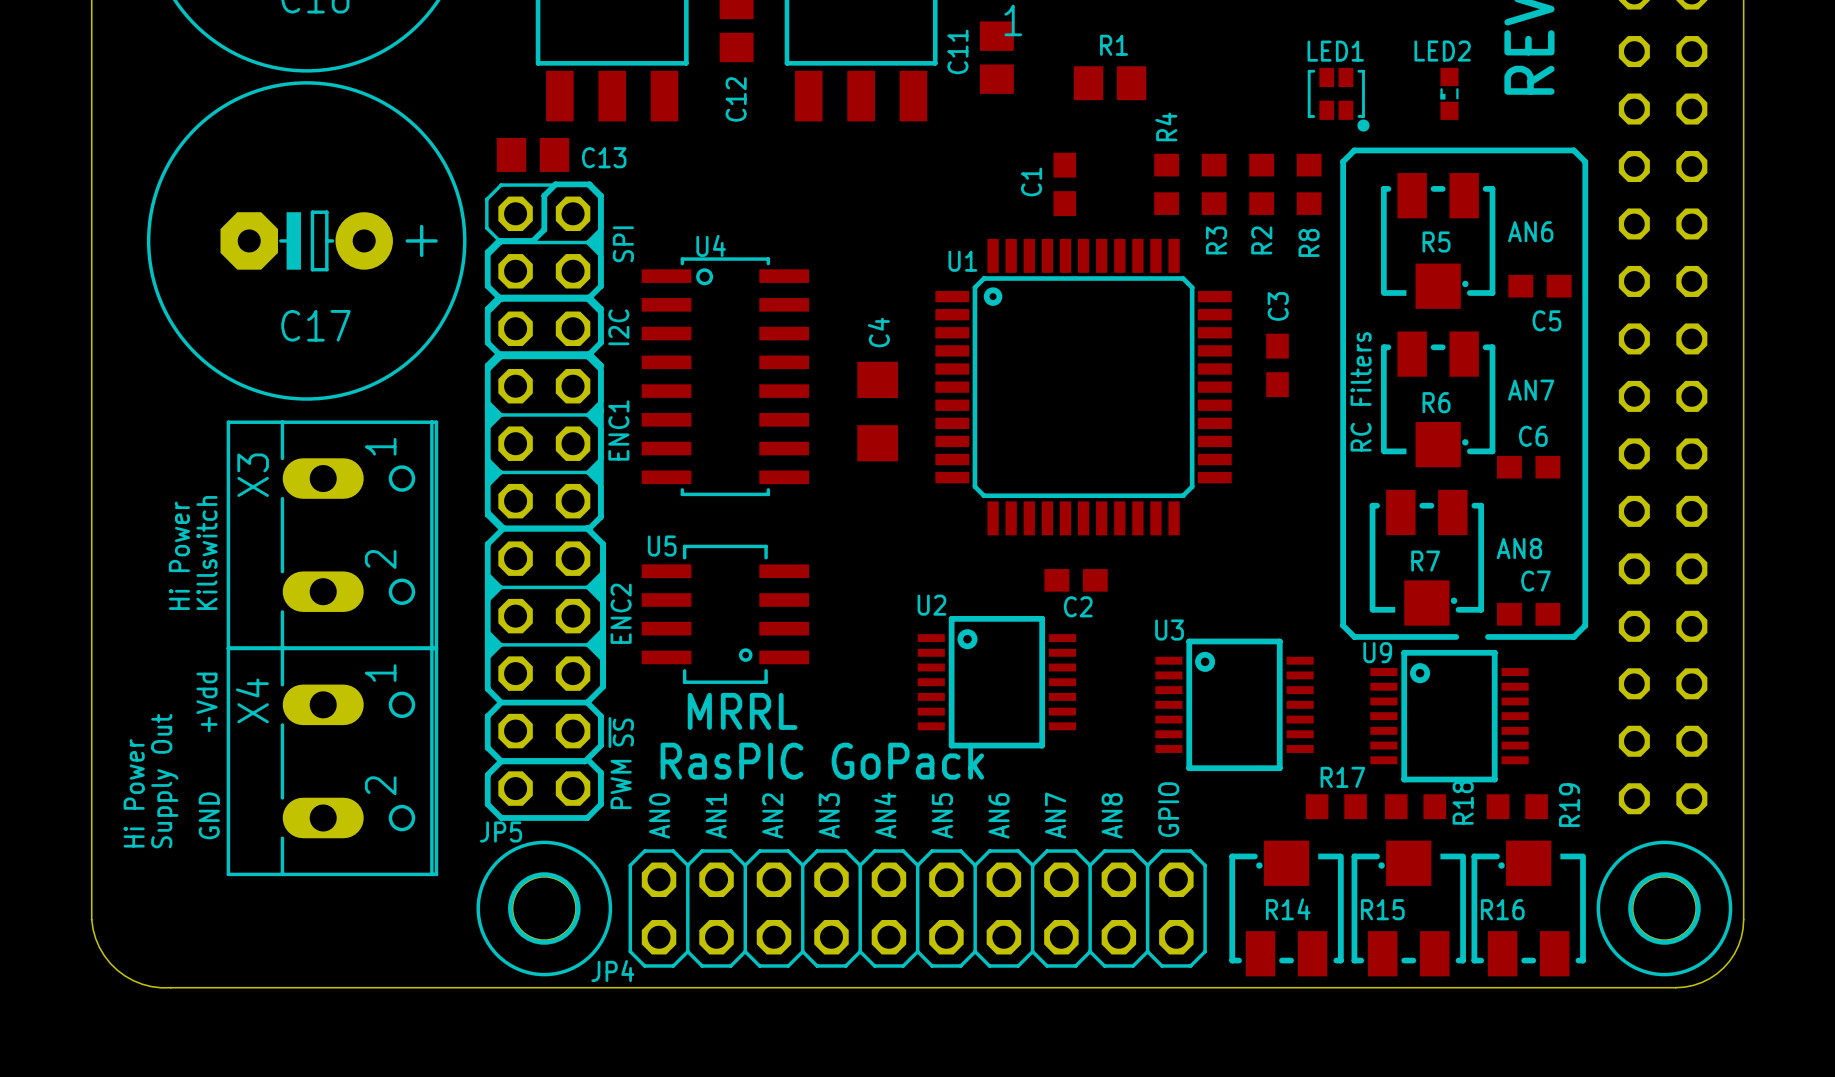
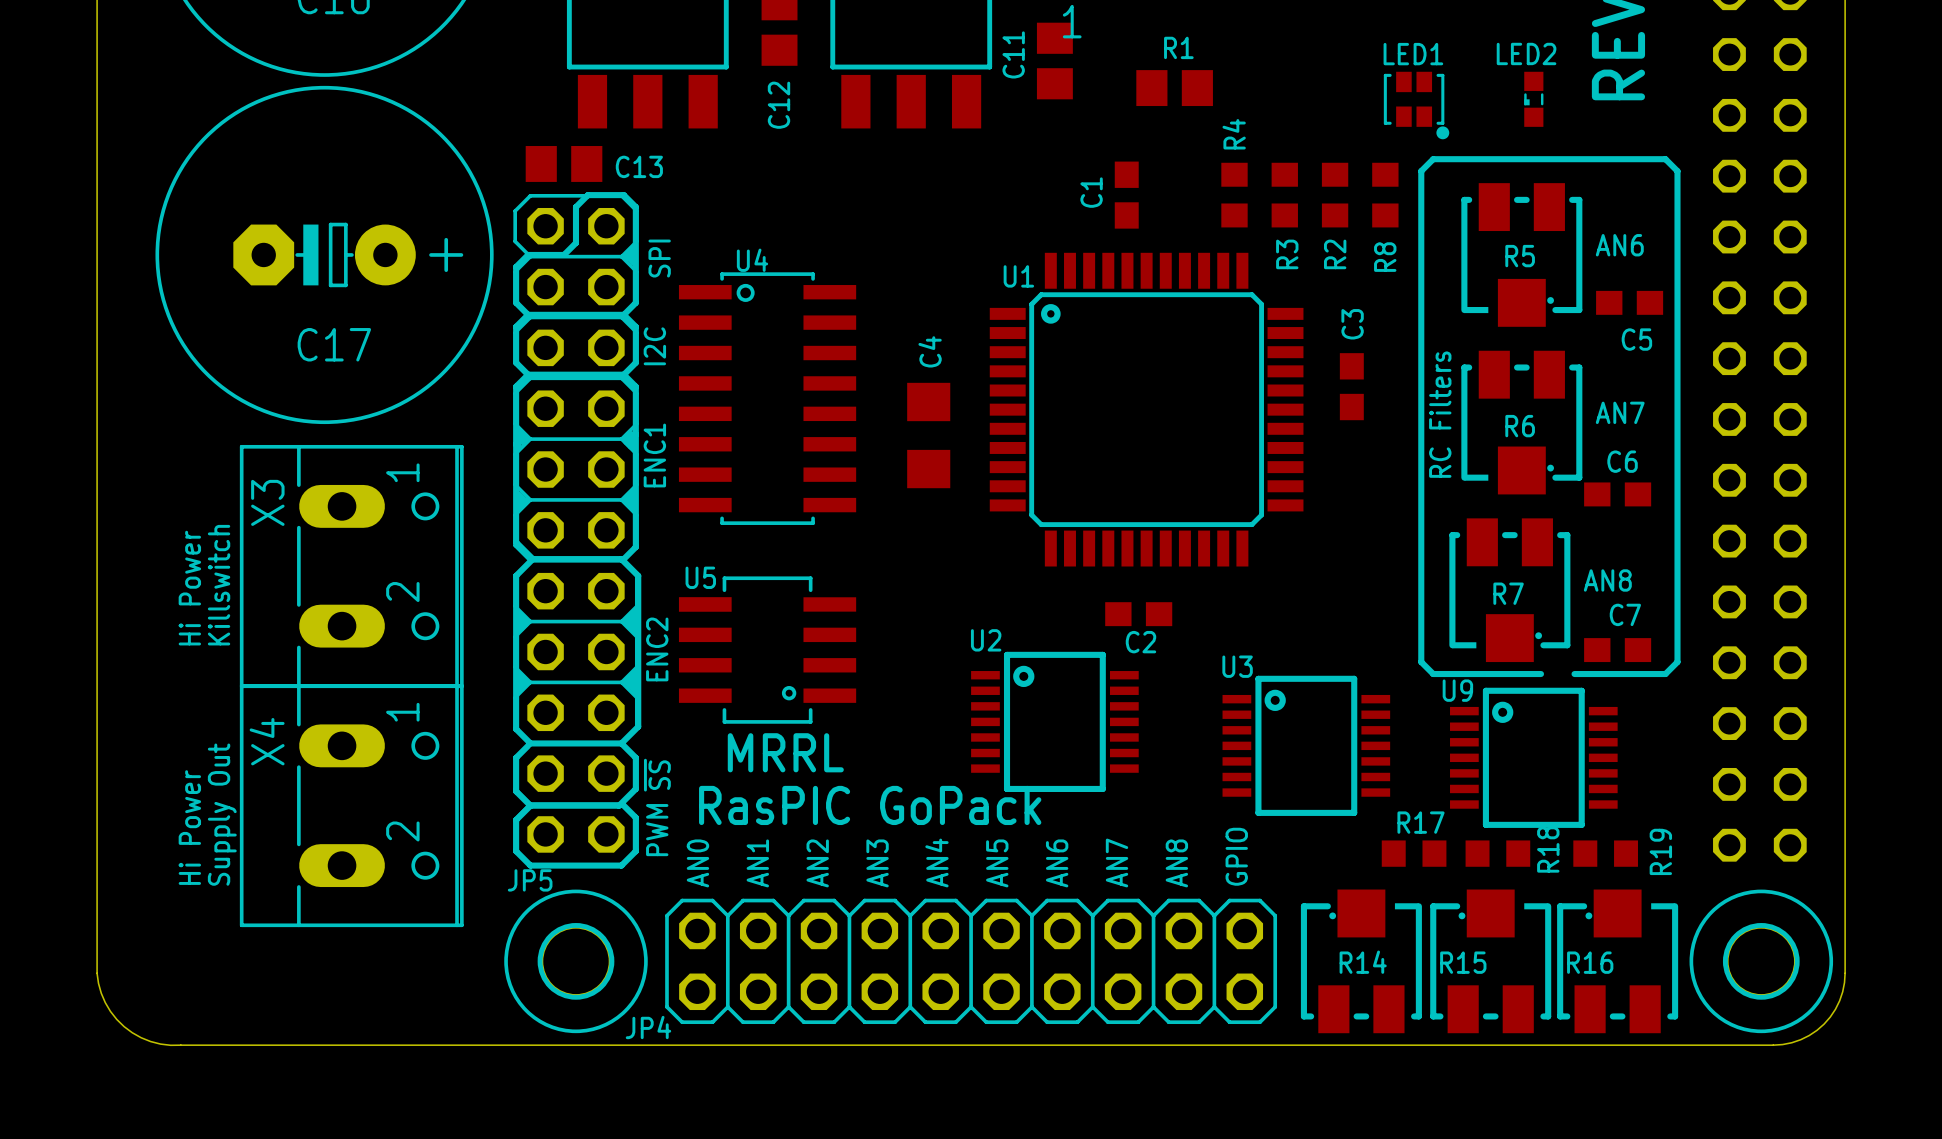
text: +Vdd (207, 702) -> none
text: Supply Out (164, 781) -> none
text position: Hi Power (134, 793) -> Hi Power (189, 827)
text: GND (209, 815) -> Supply Out (222, 814)

